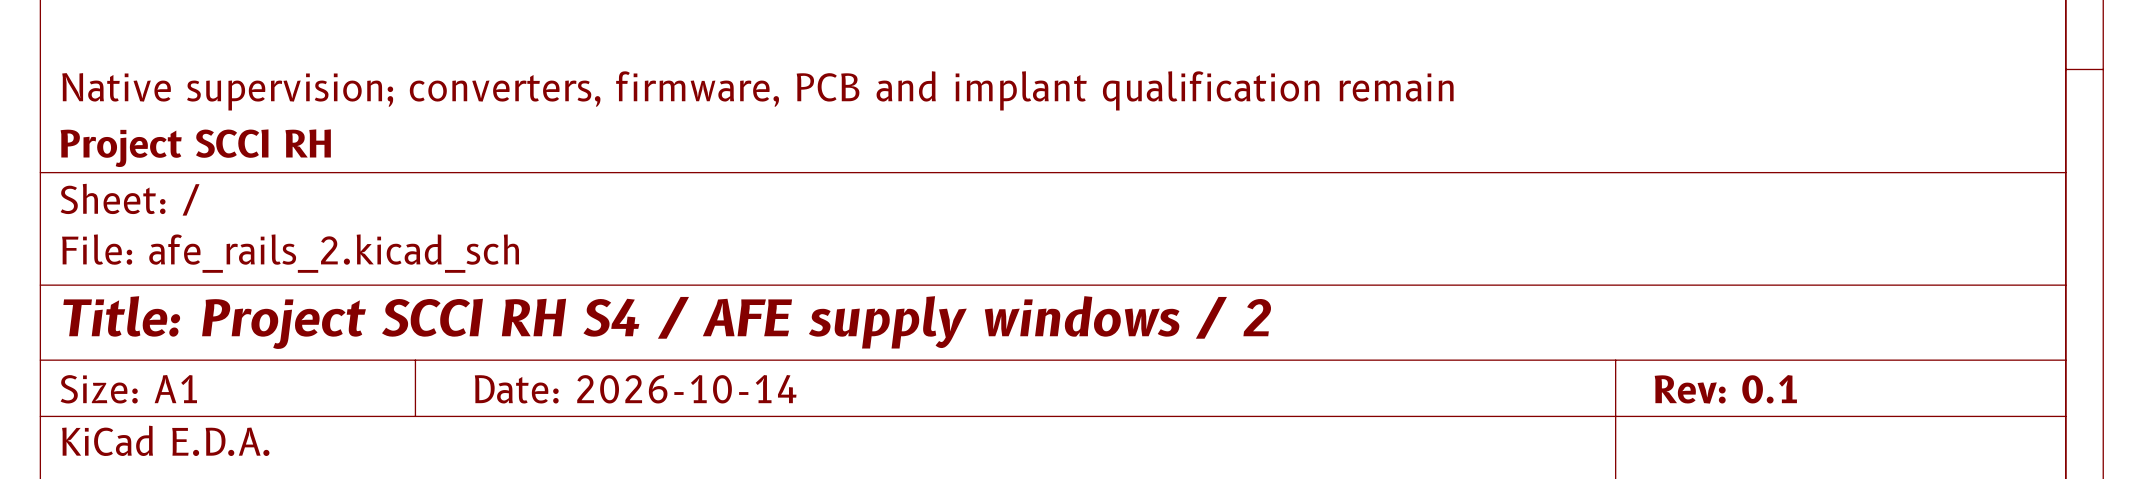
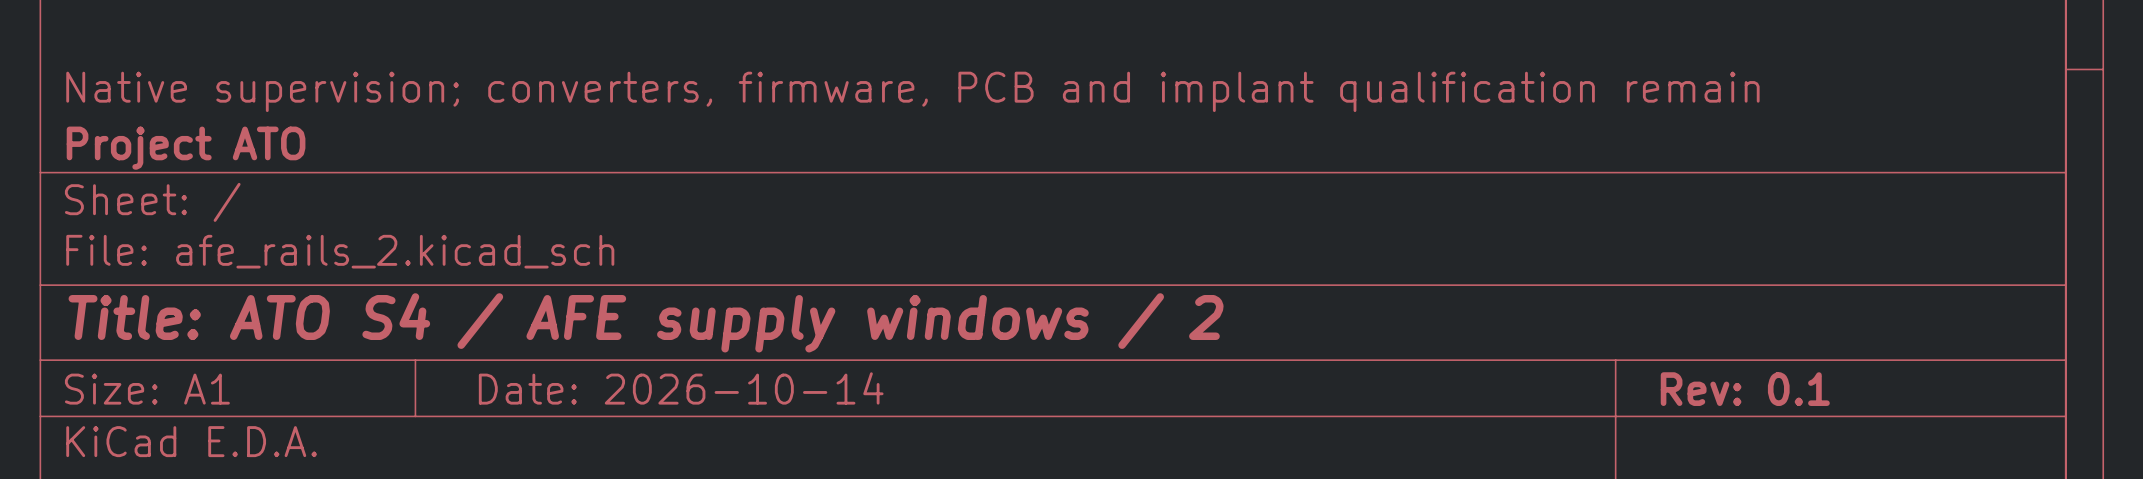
title block: Project SCCI RH (195, 148) -> Project ATO (186, 148)
title block: Title: Project SCCI RH S4 / AFE supply windows / 2 (667, 322) -> Title: ATO S4 / AFE supply windows / 2 (646, 322)

